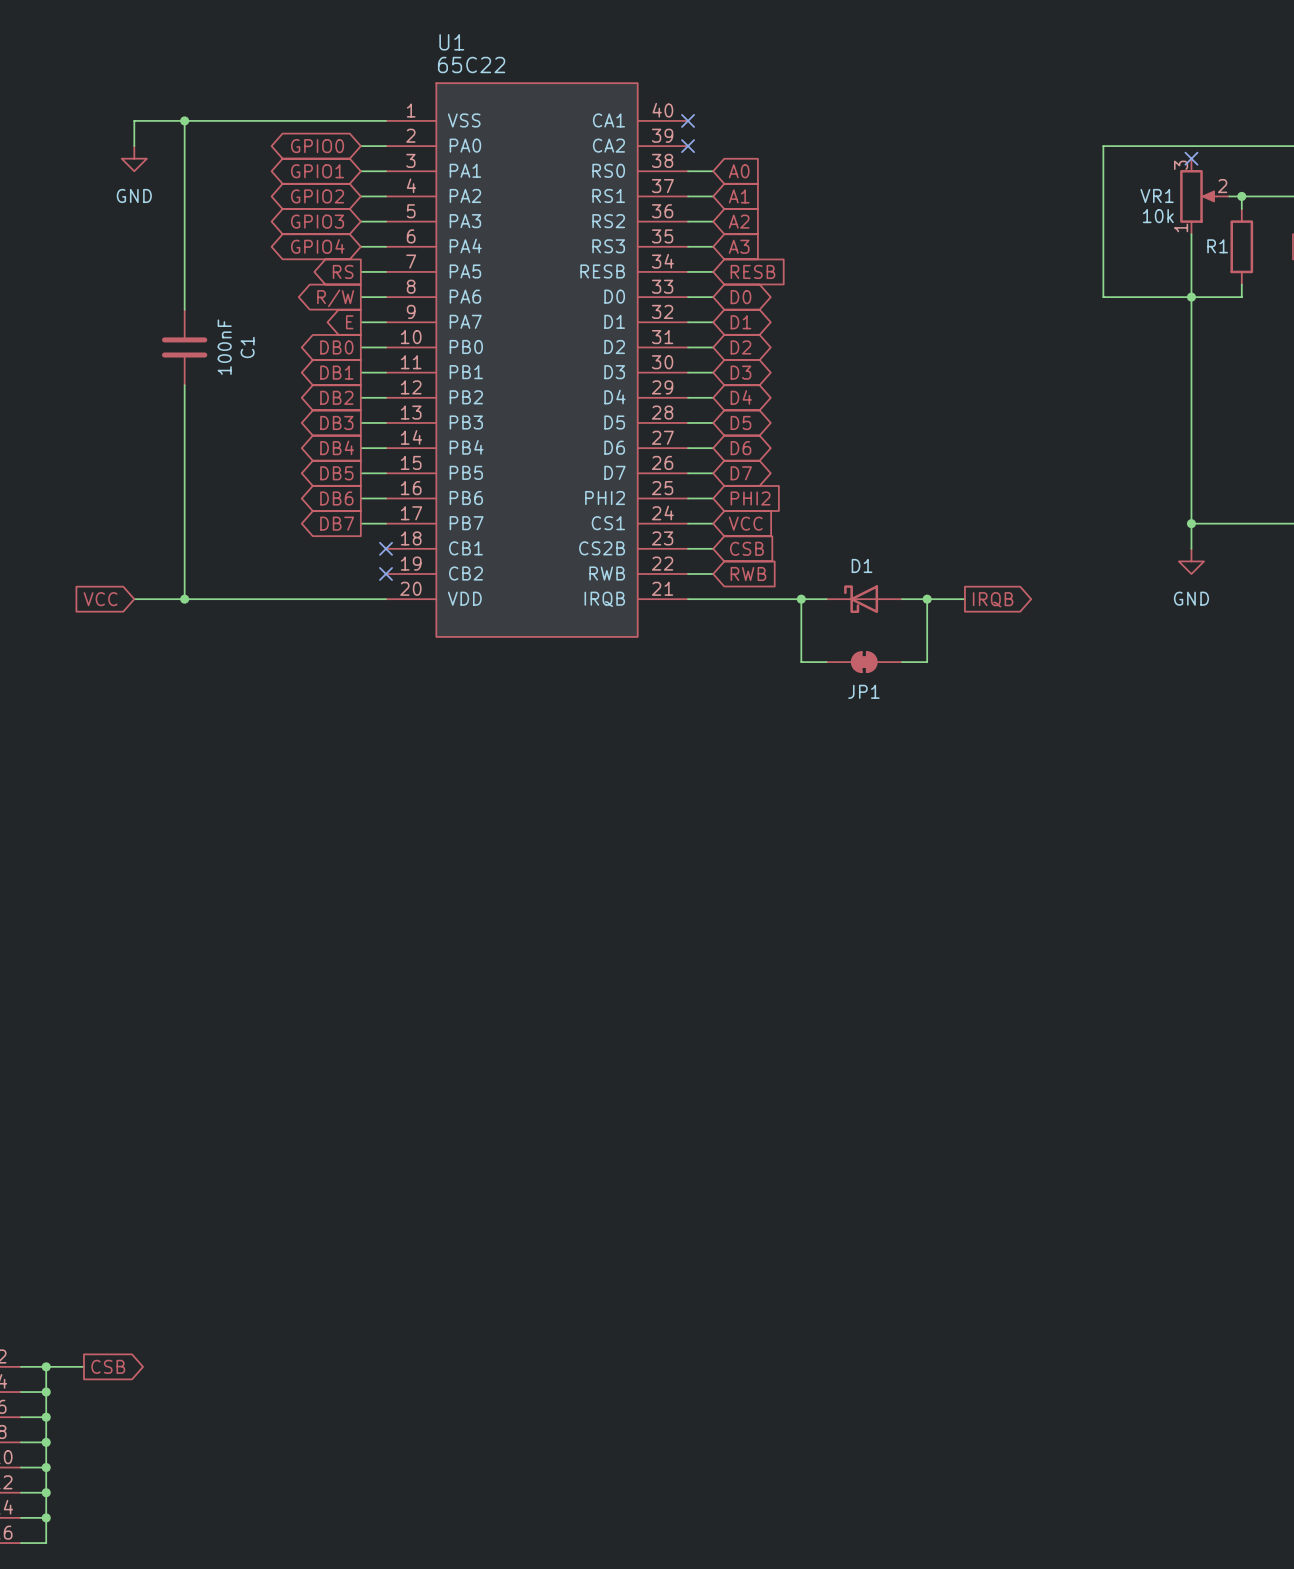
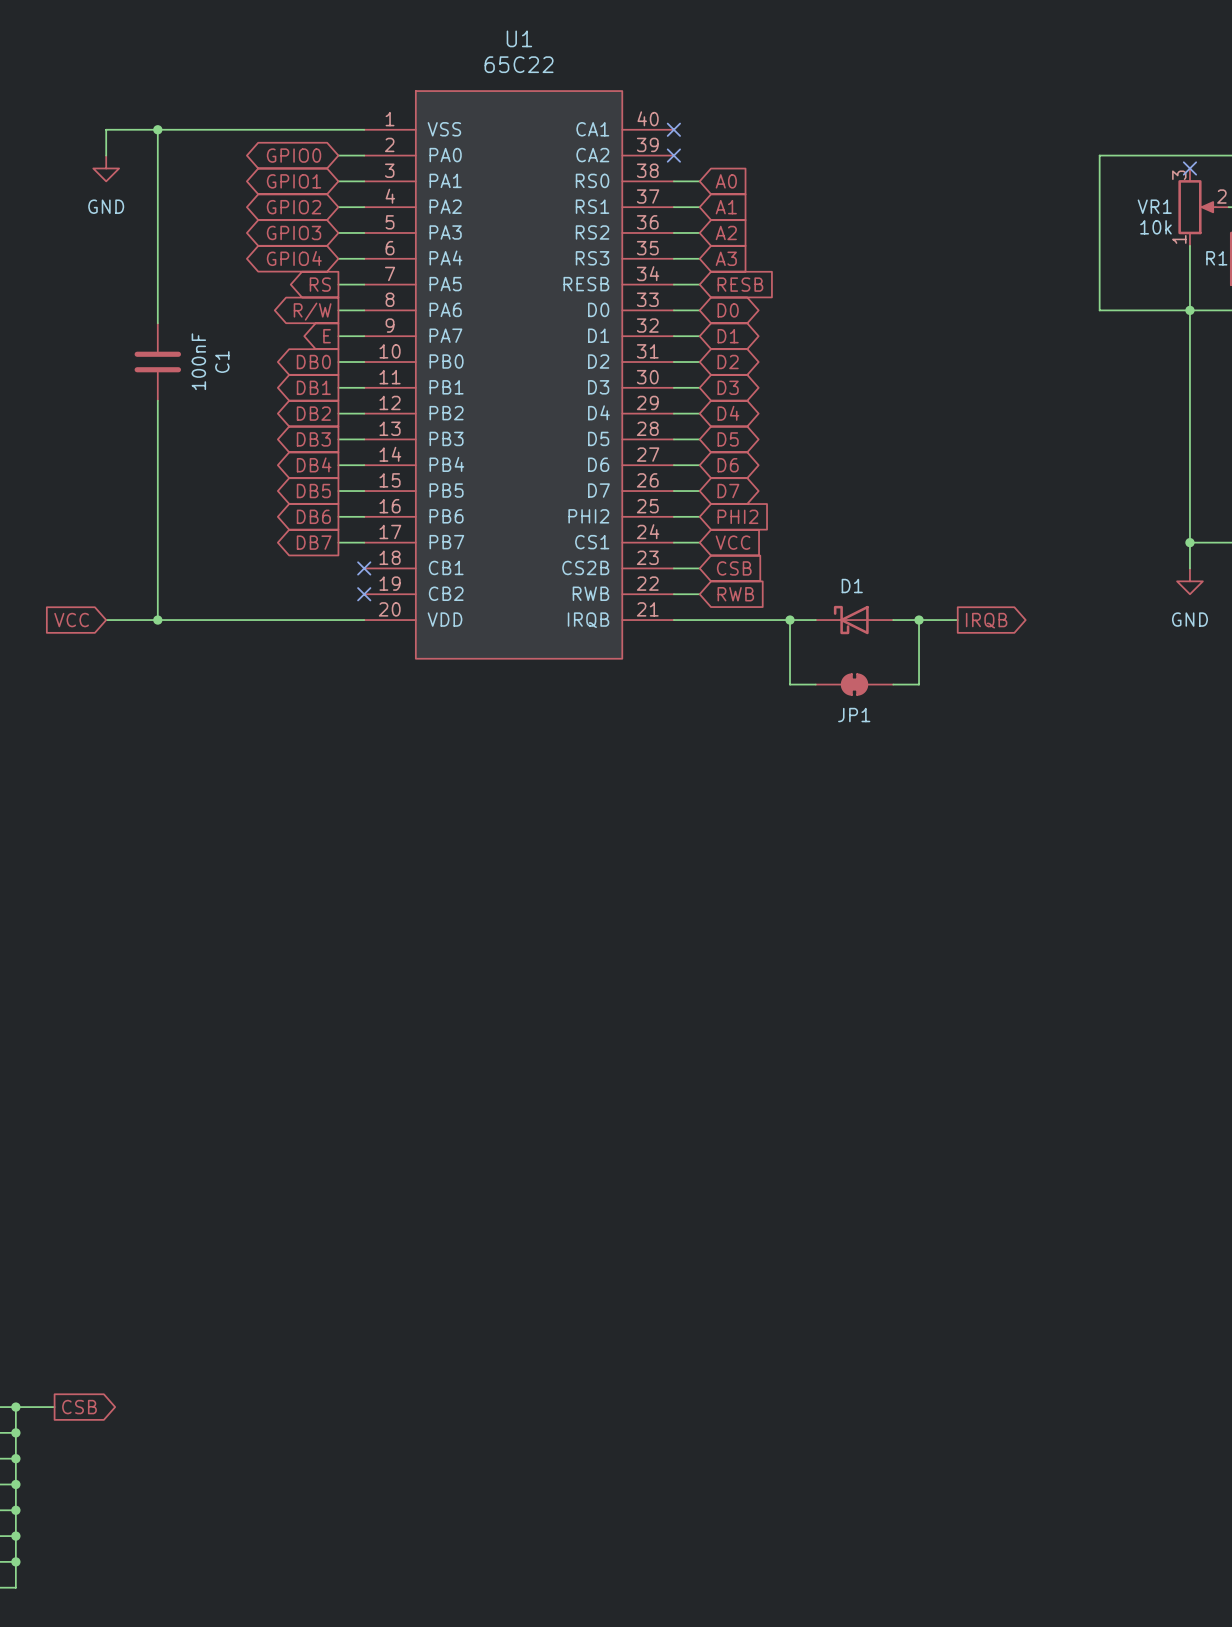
U1 name position: U1 (451, 42) -> U1 (519, 38)
U1 value position: 65C22 (471, 65) -> 65C22 (519, 64)

